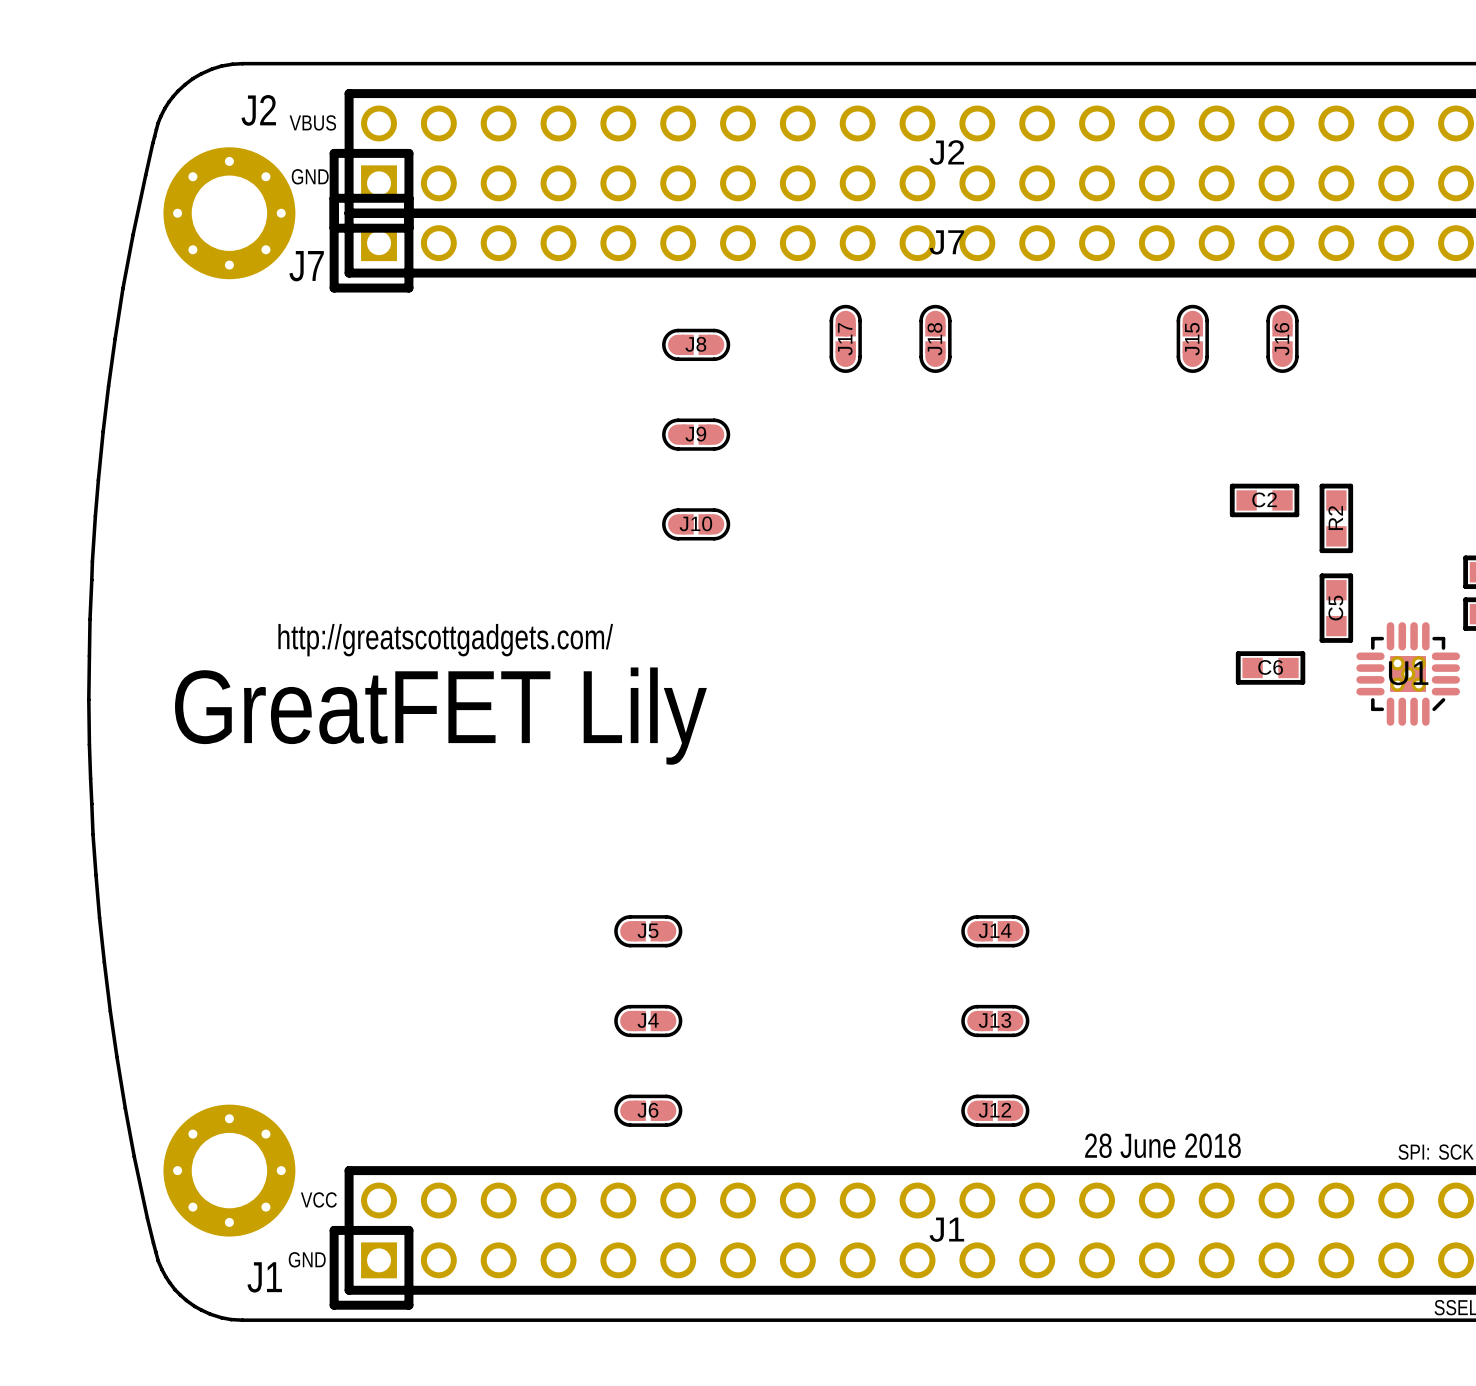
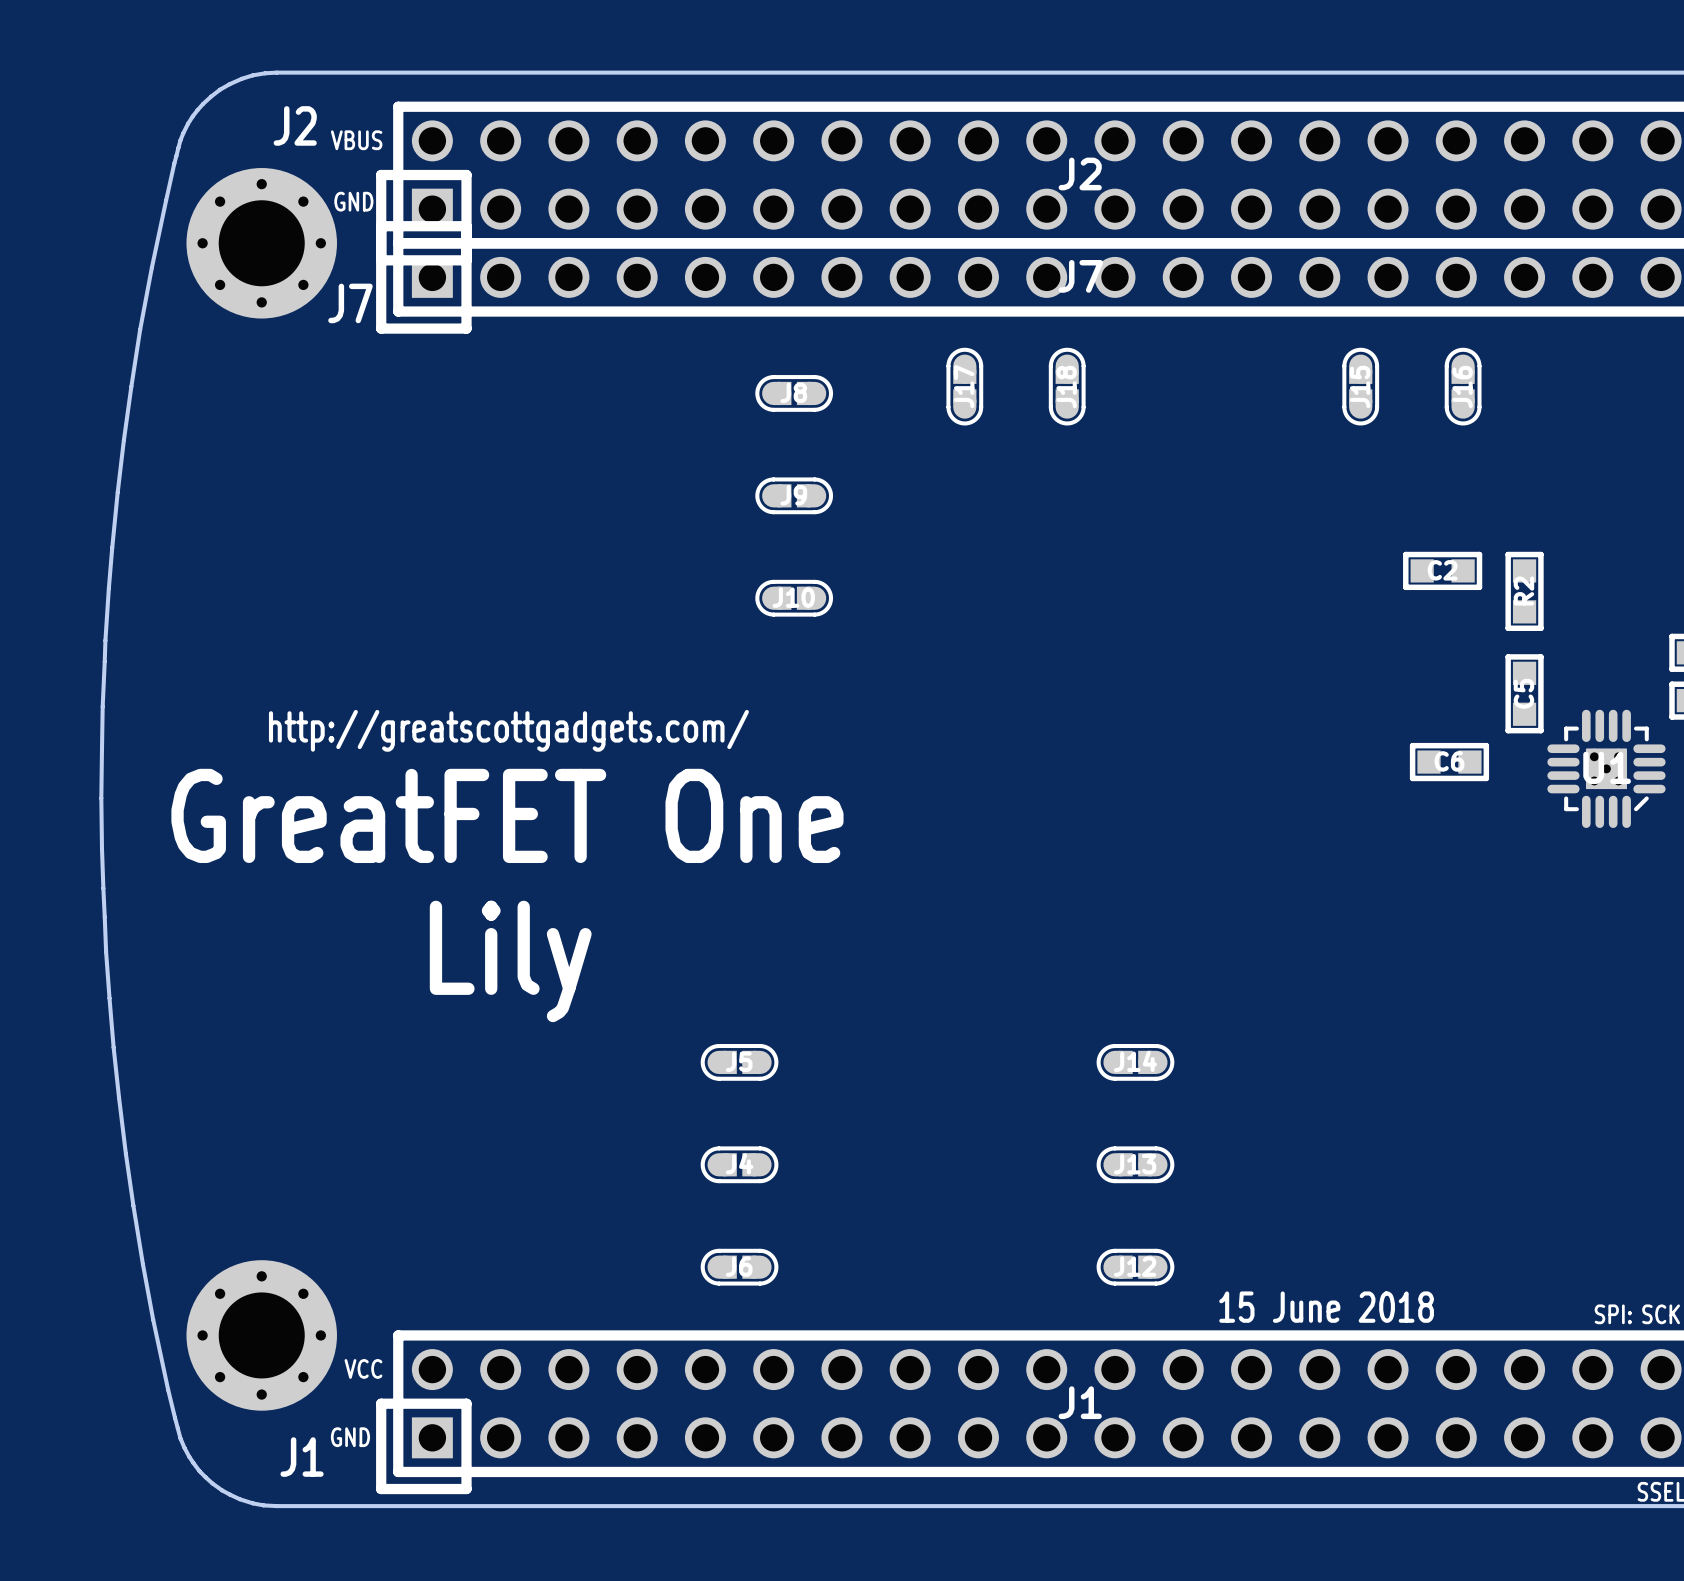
text: GreatFET Lily (440, 716) -> GreatFET One (507, 815)
text: none -> Lily (510, 961)
text: 28 June 2018 (1162, 1145) -> 15 June 2018 (1326, 1307)

